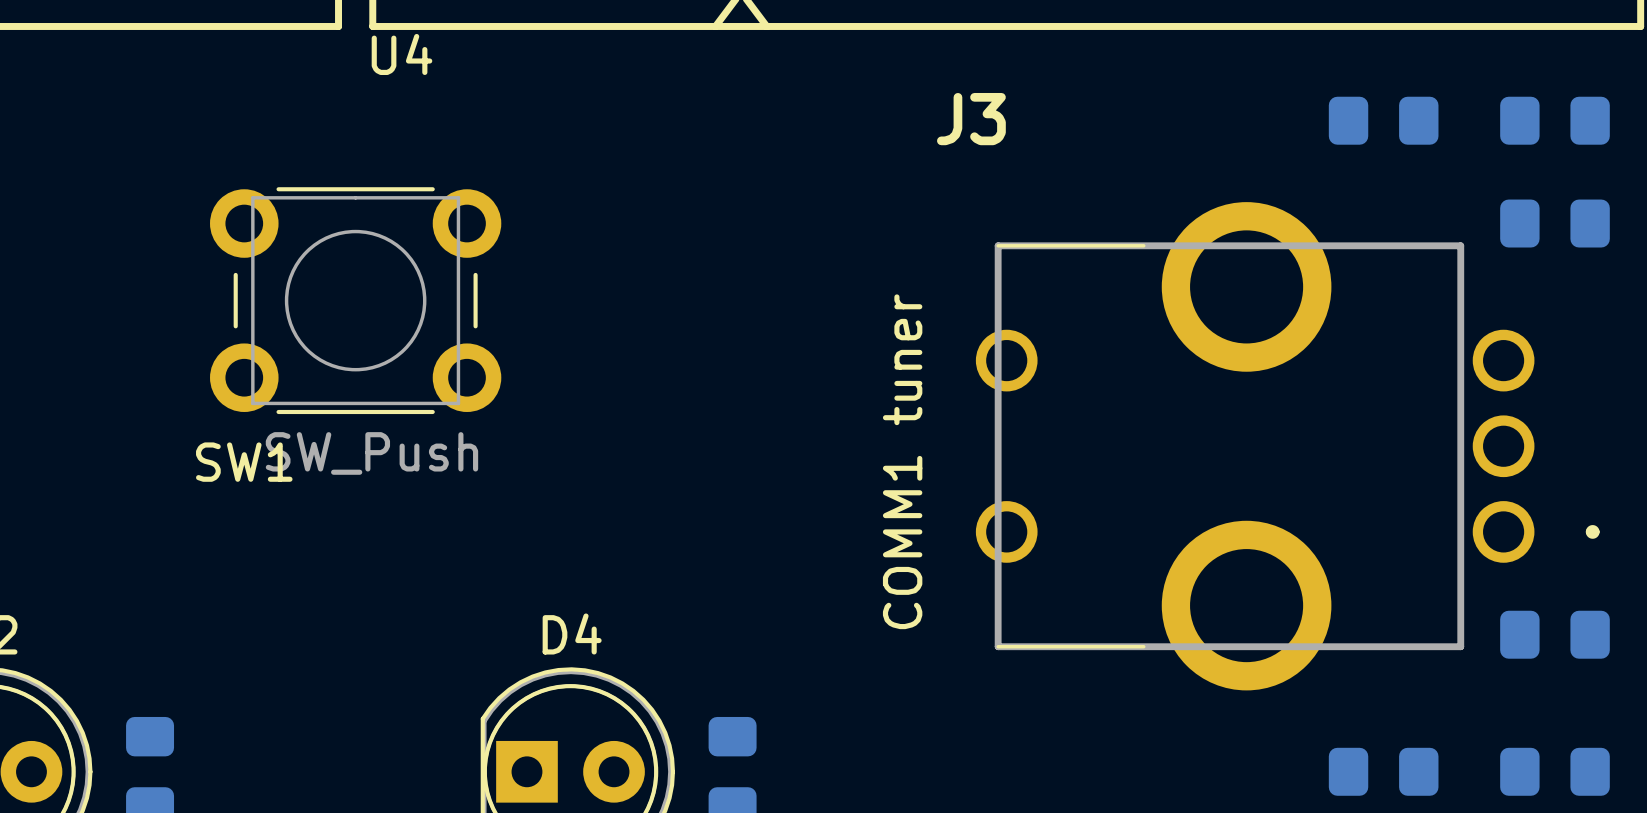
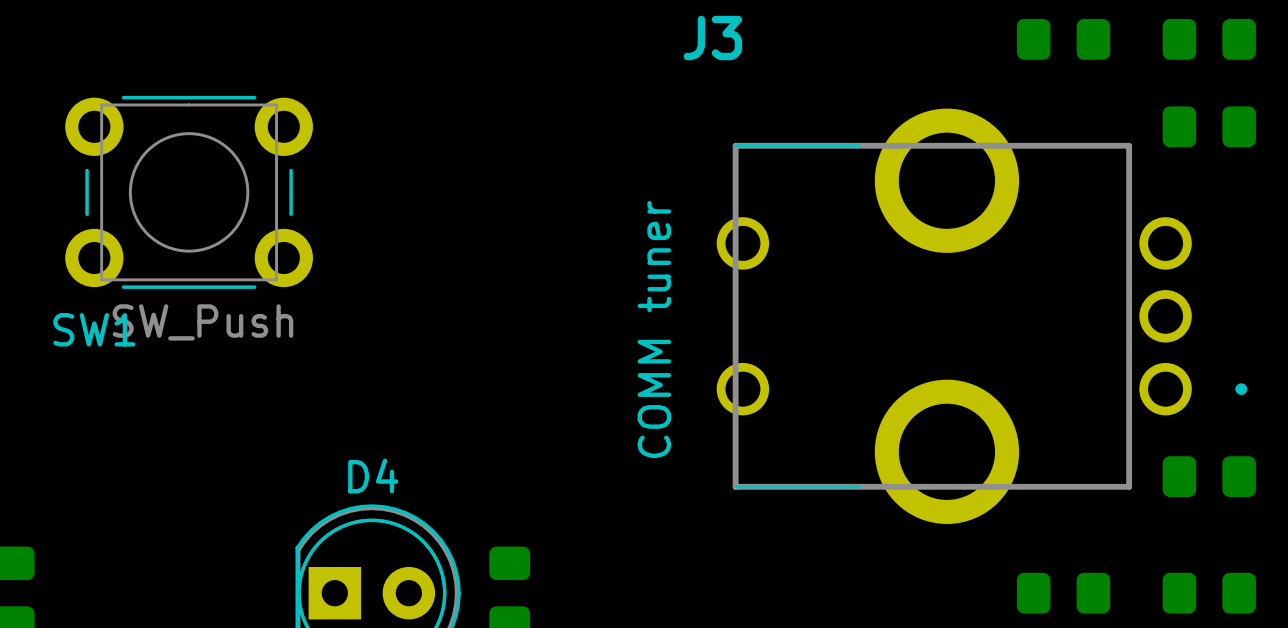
text: COMM1 tuner (902, 461) -> COMM tuner (654, 329)

